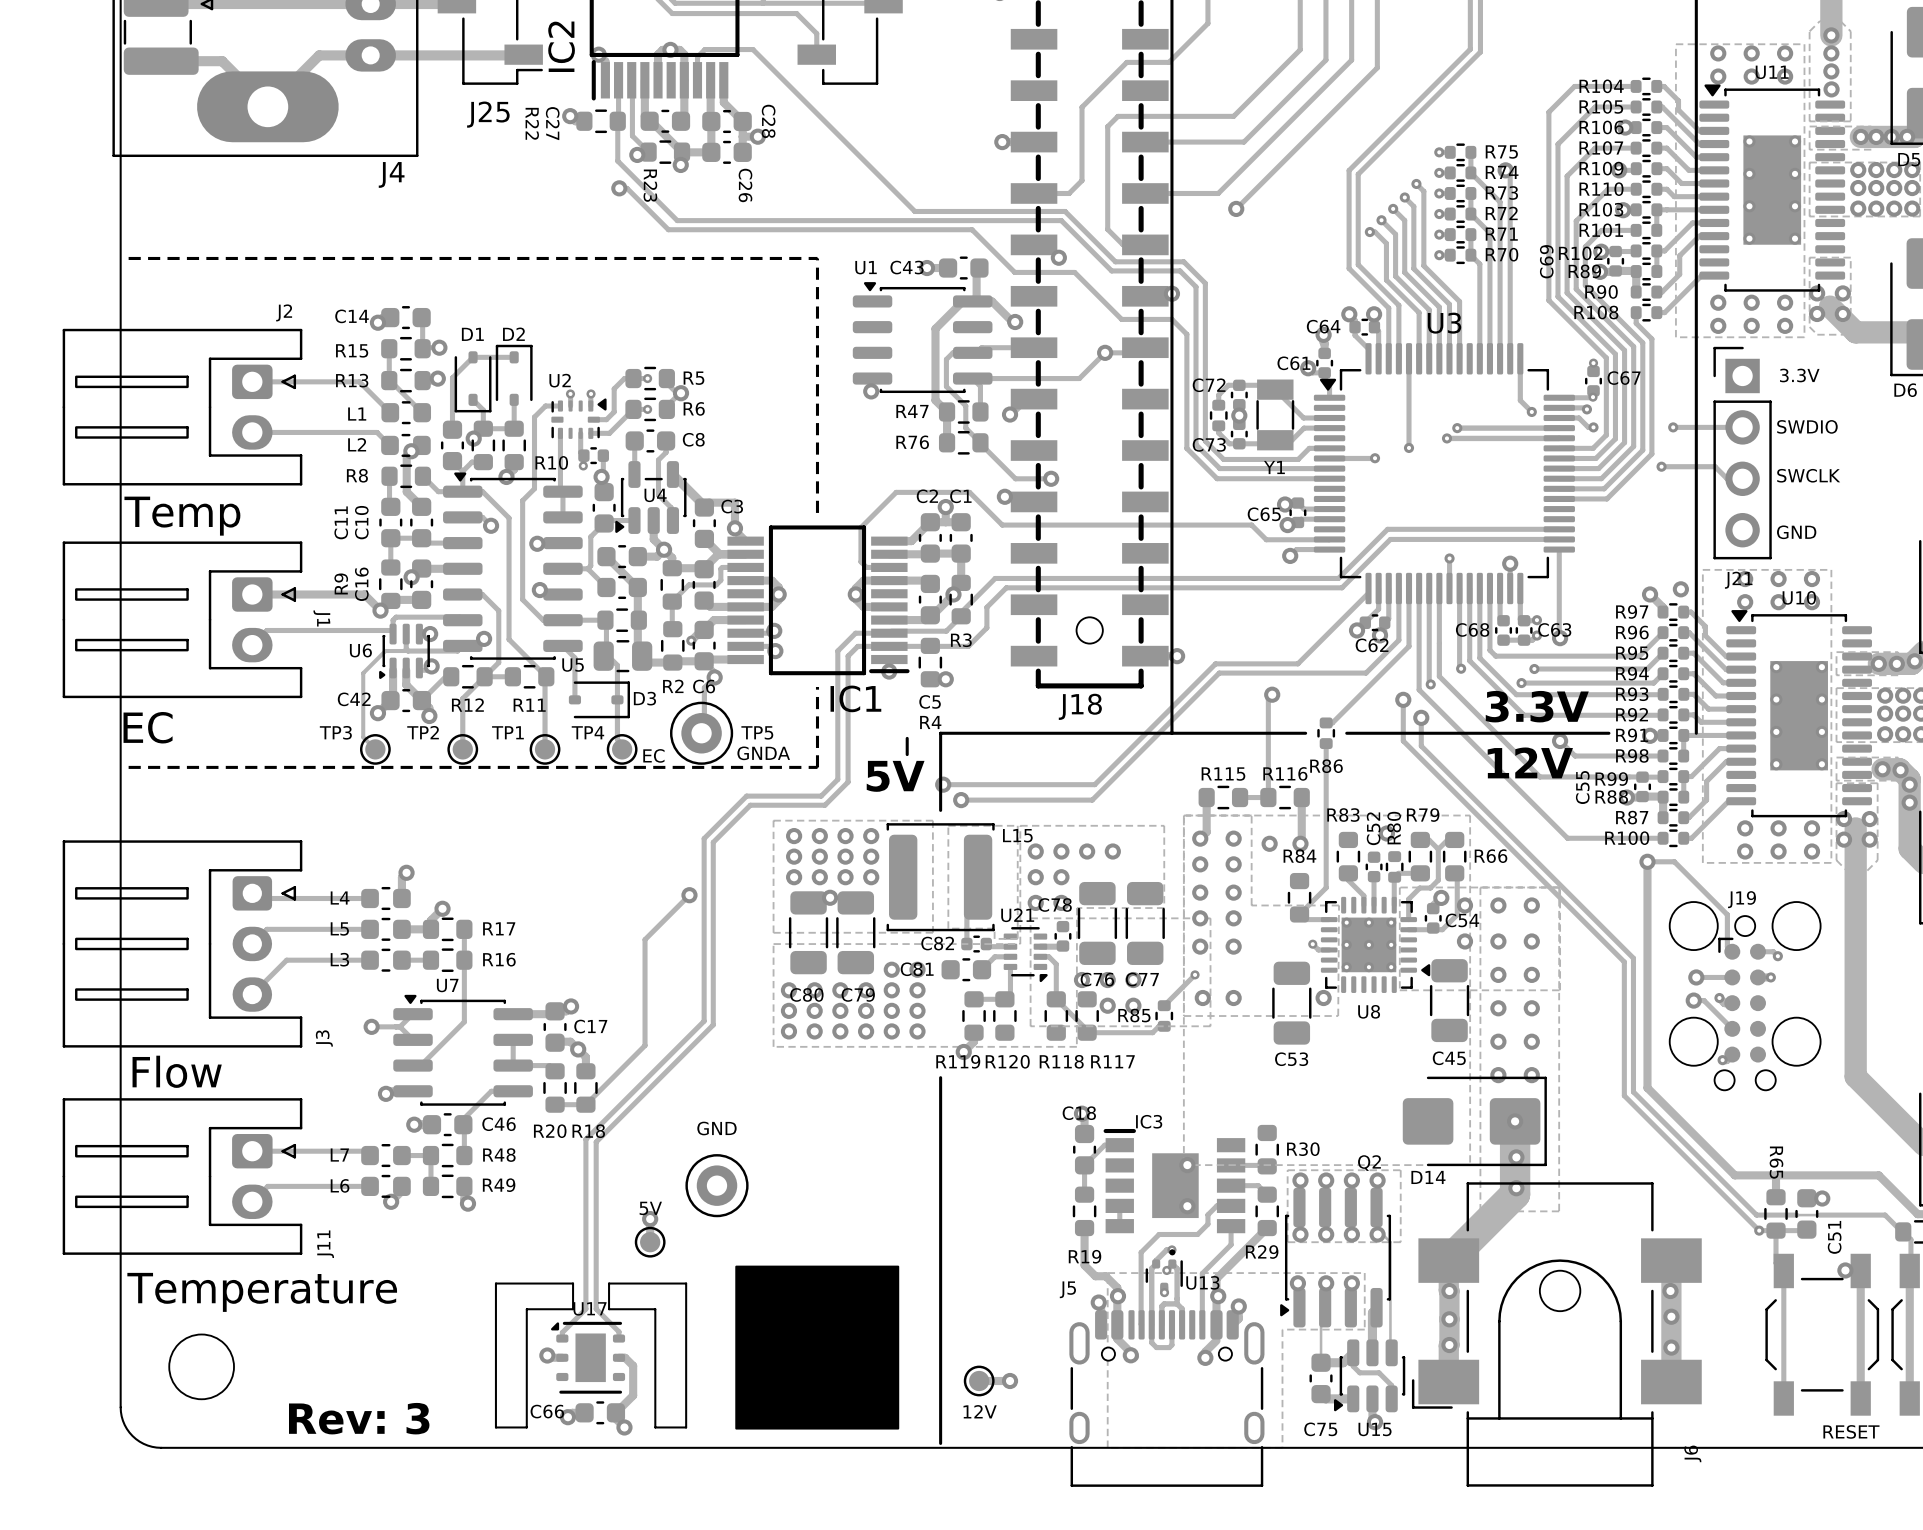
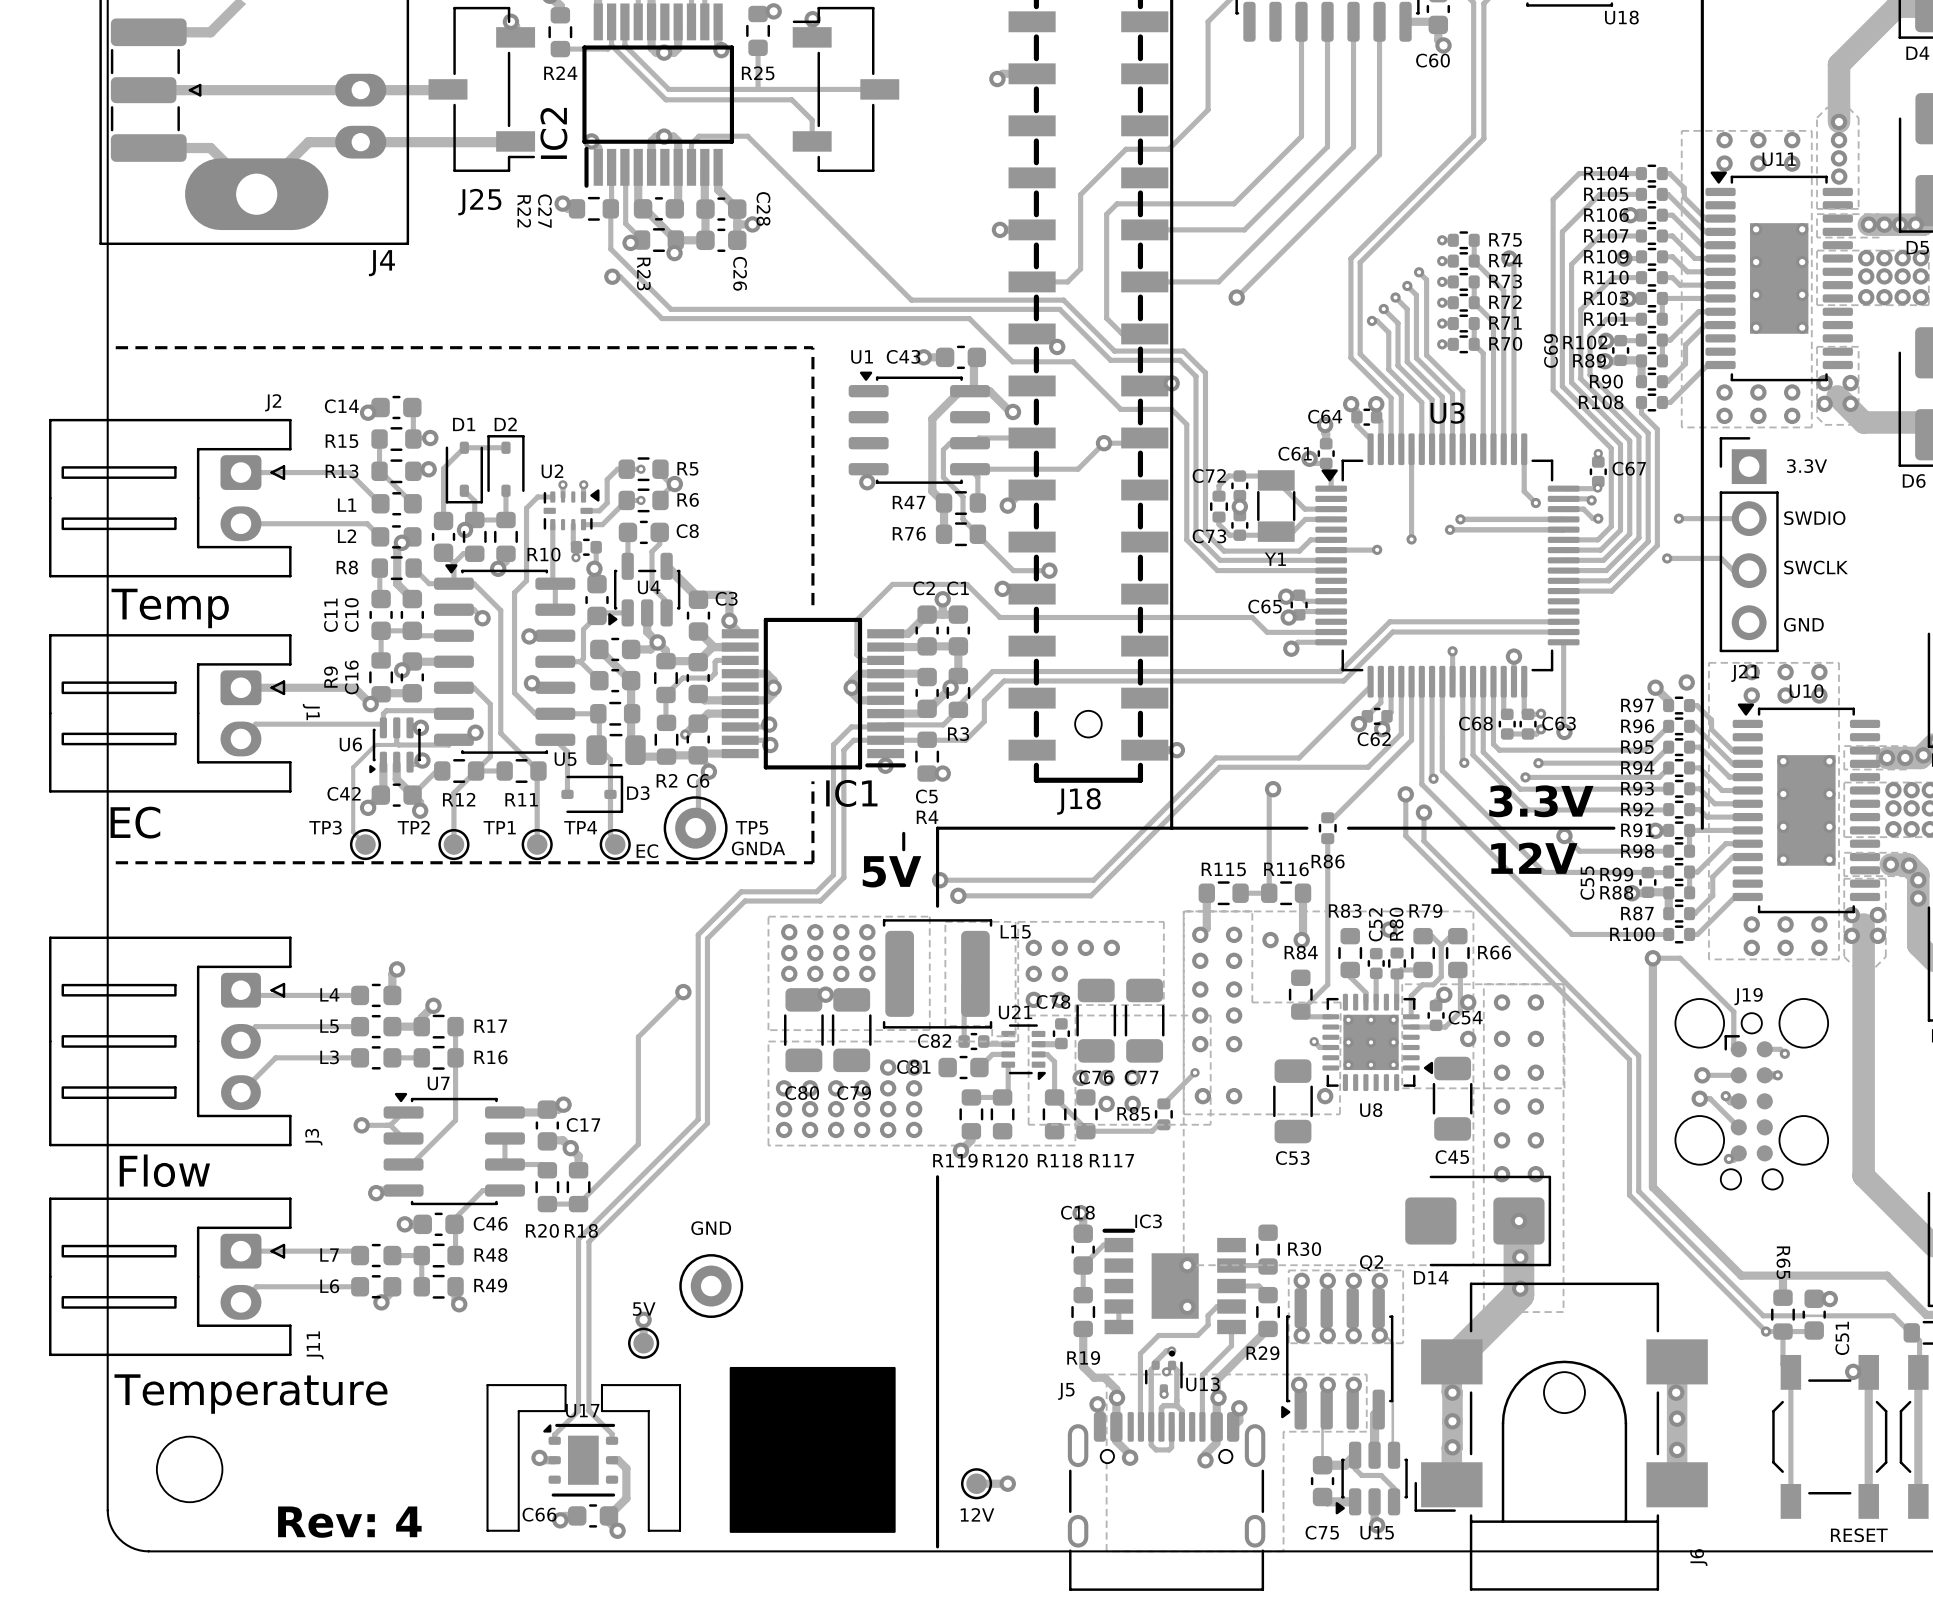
text: Rev: 3 (359, 1418) -> Rev: 4 (349, 1522)

